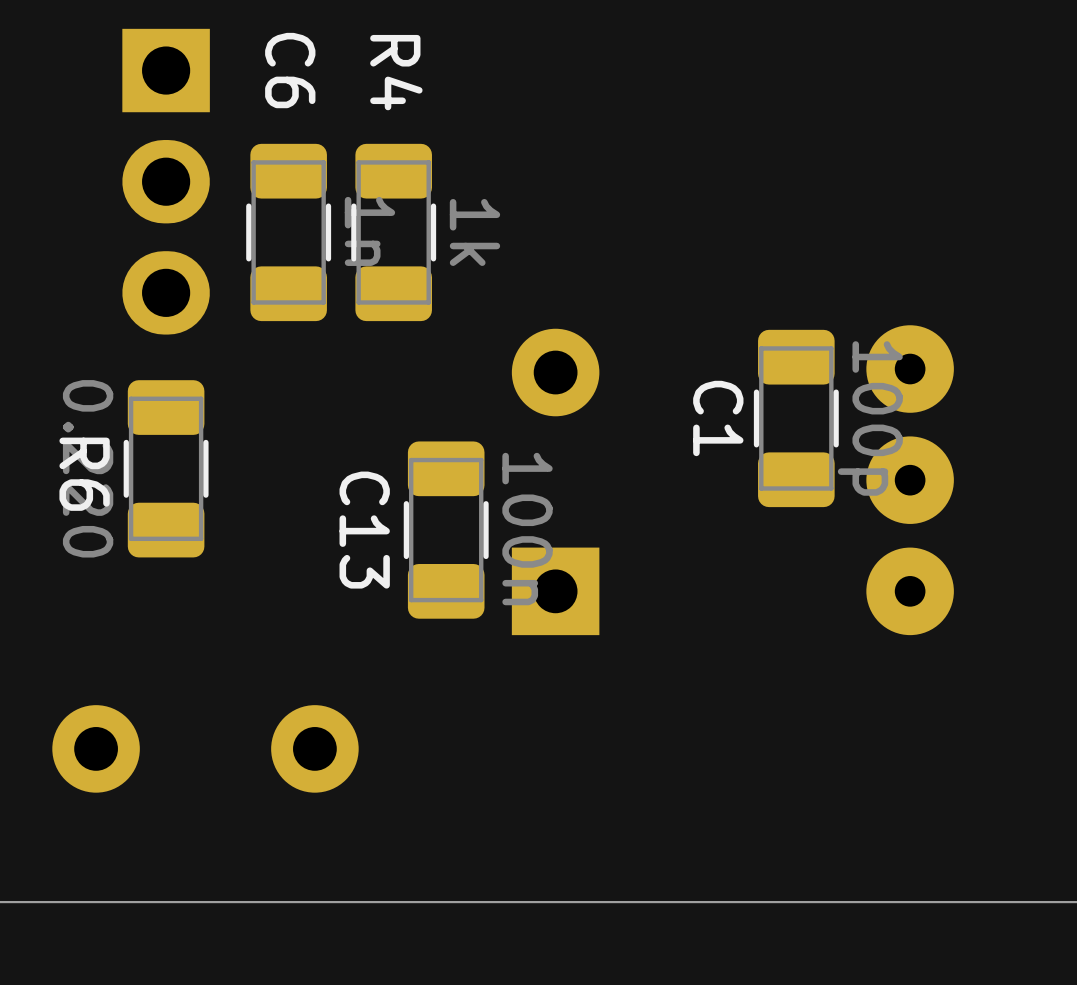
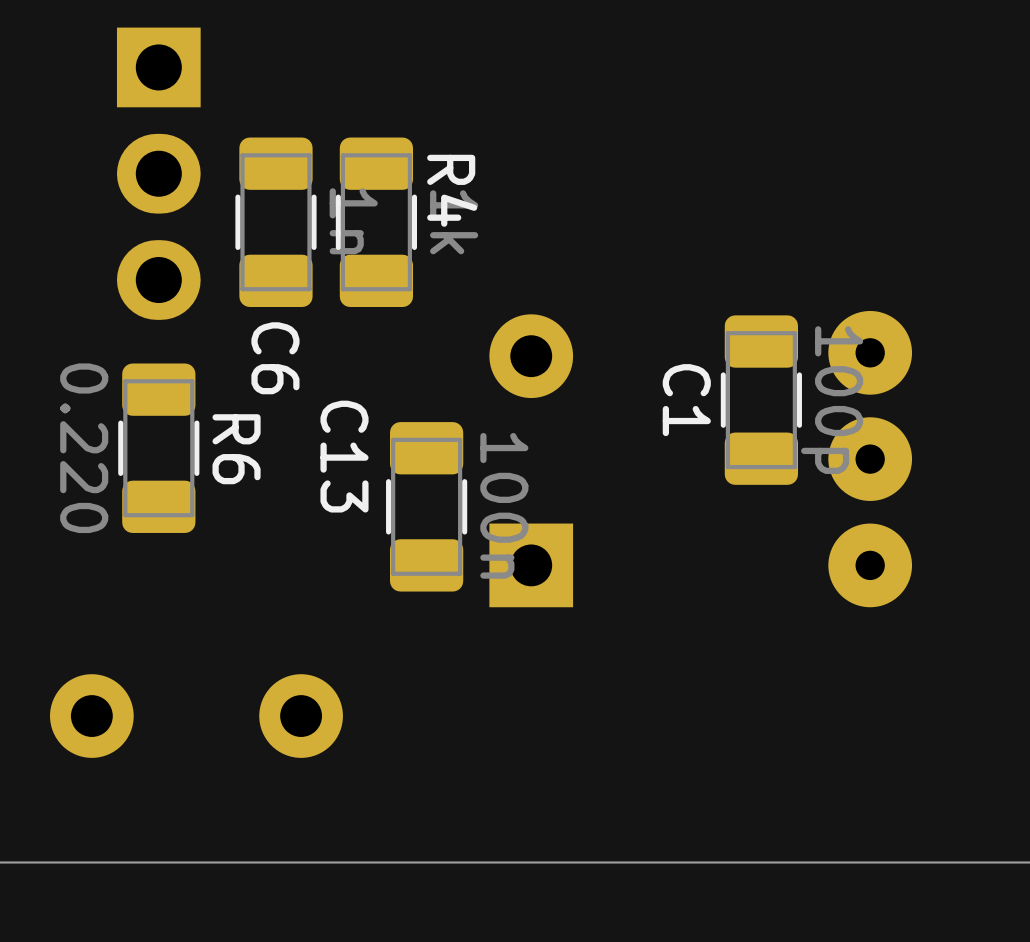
C6 name position: C6 (290, 70) -> C6 (275, 358)
R4 name position: R4 (396, 72) -> R4 (452, 190)
R6 name position: R6 (84, 474) -> R6 (236, 449)
C13 name position: C13 (364, 530) -> C13 (344, 456)

